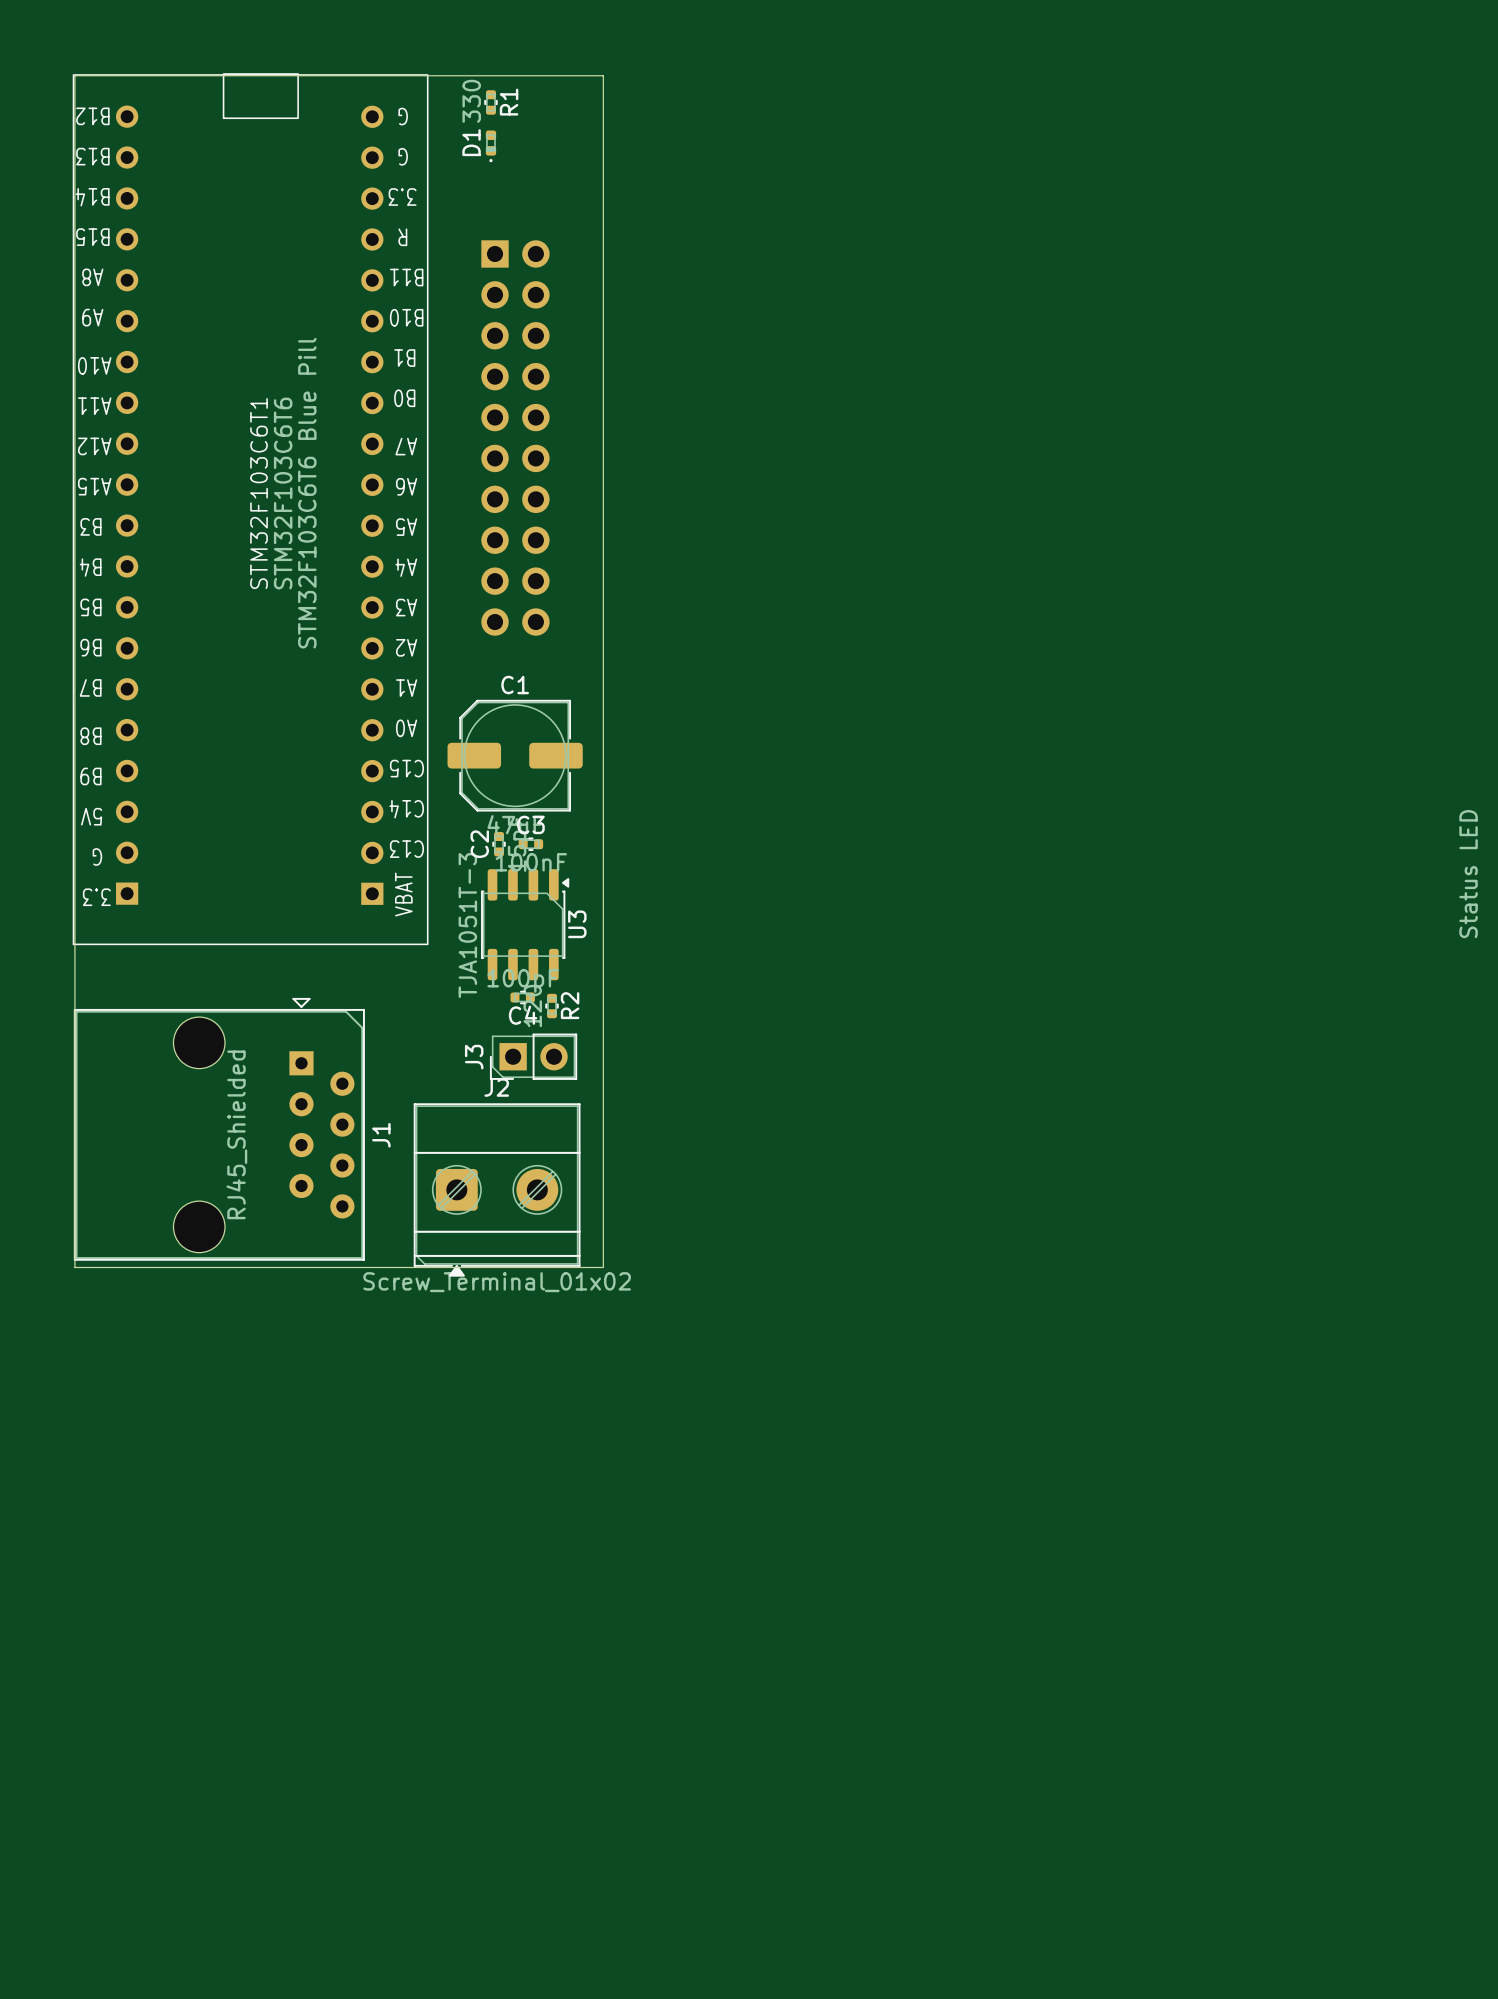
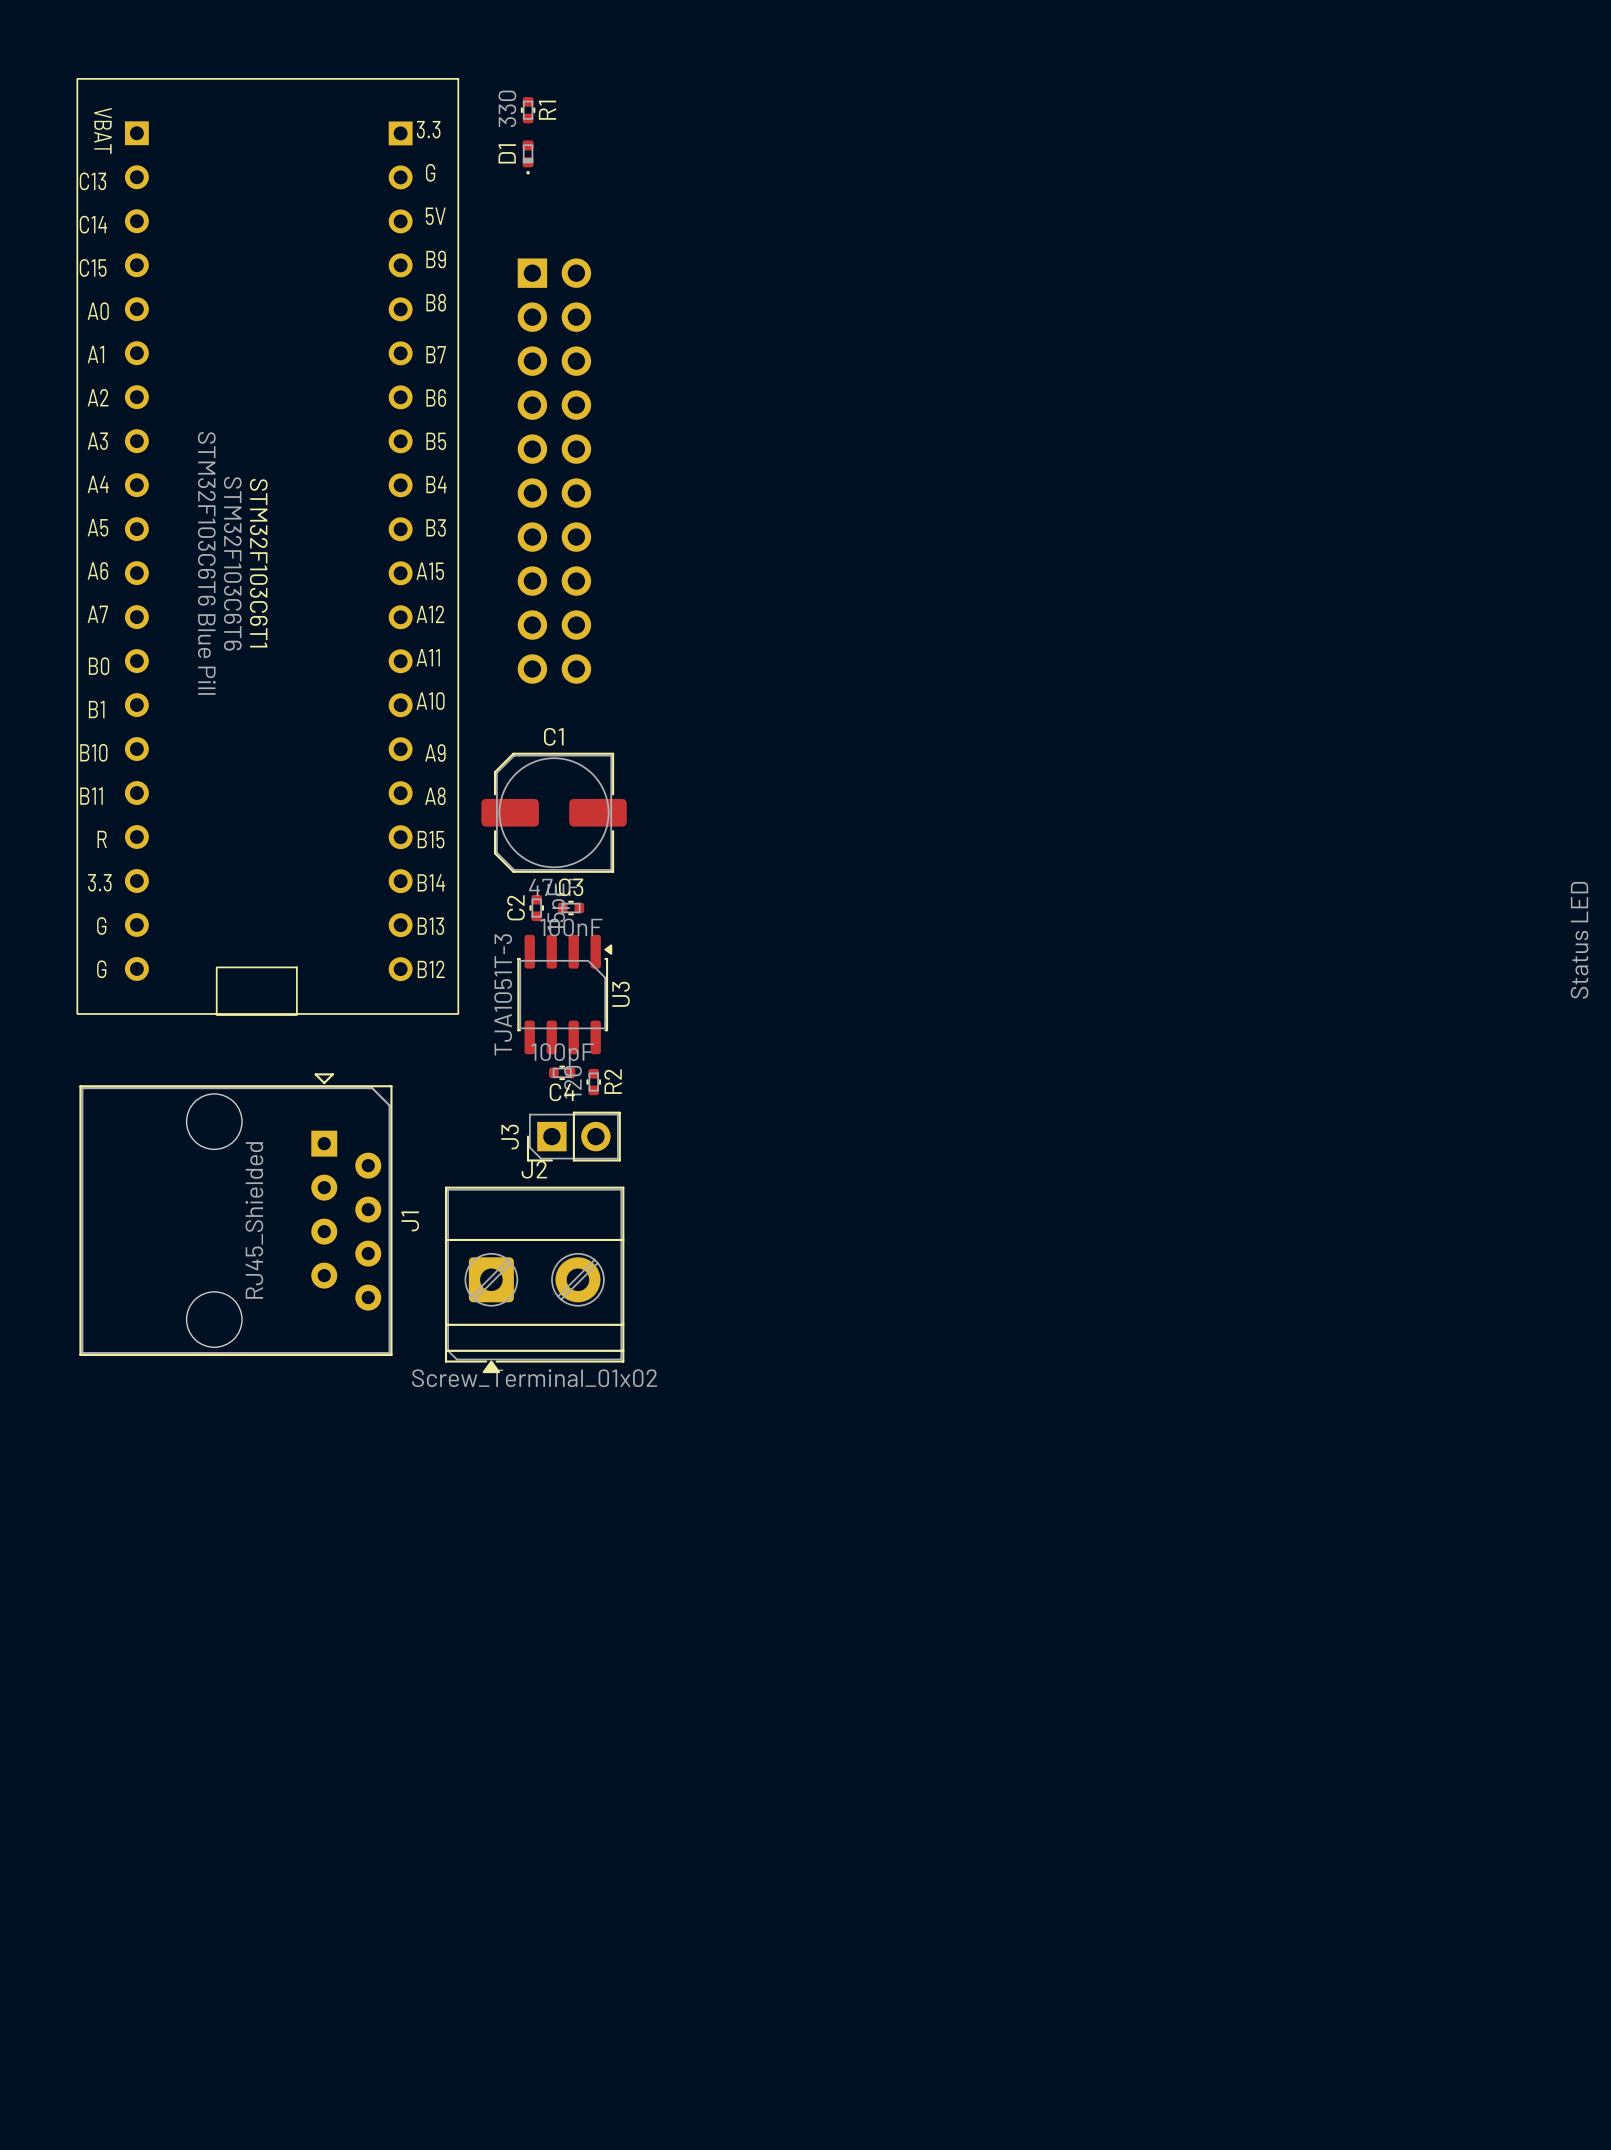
board edge: (74, 75) (603, 75) (603, 1267) (74, 1267) (74, 75) -> none
STM32F103C6T1 rotation: 0° (250, 509) -> 180° (267, 546)

